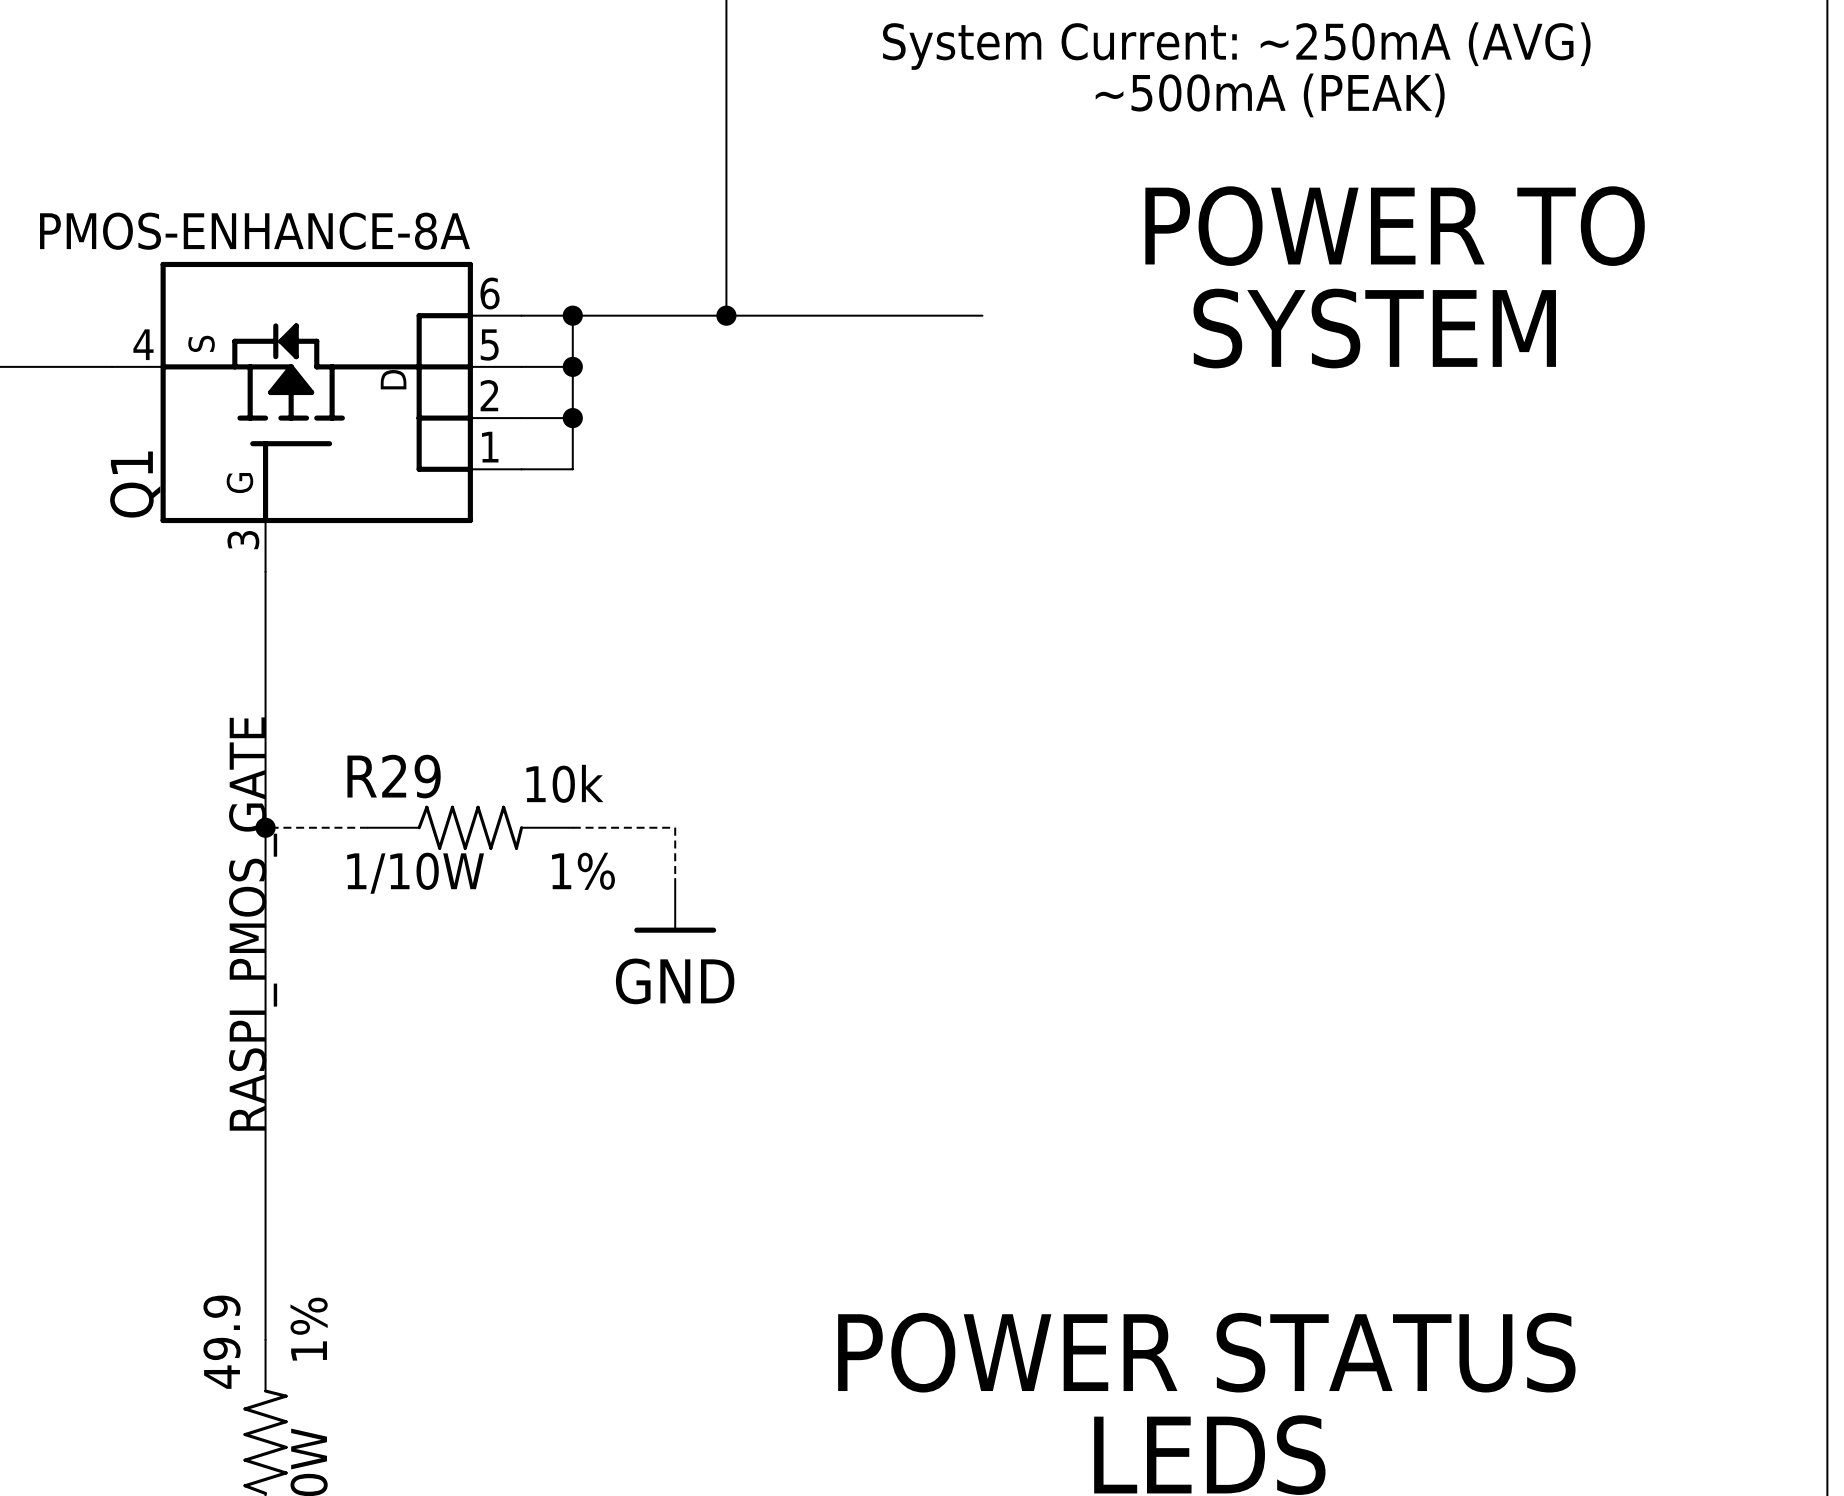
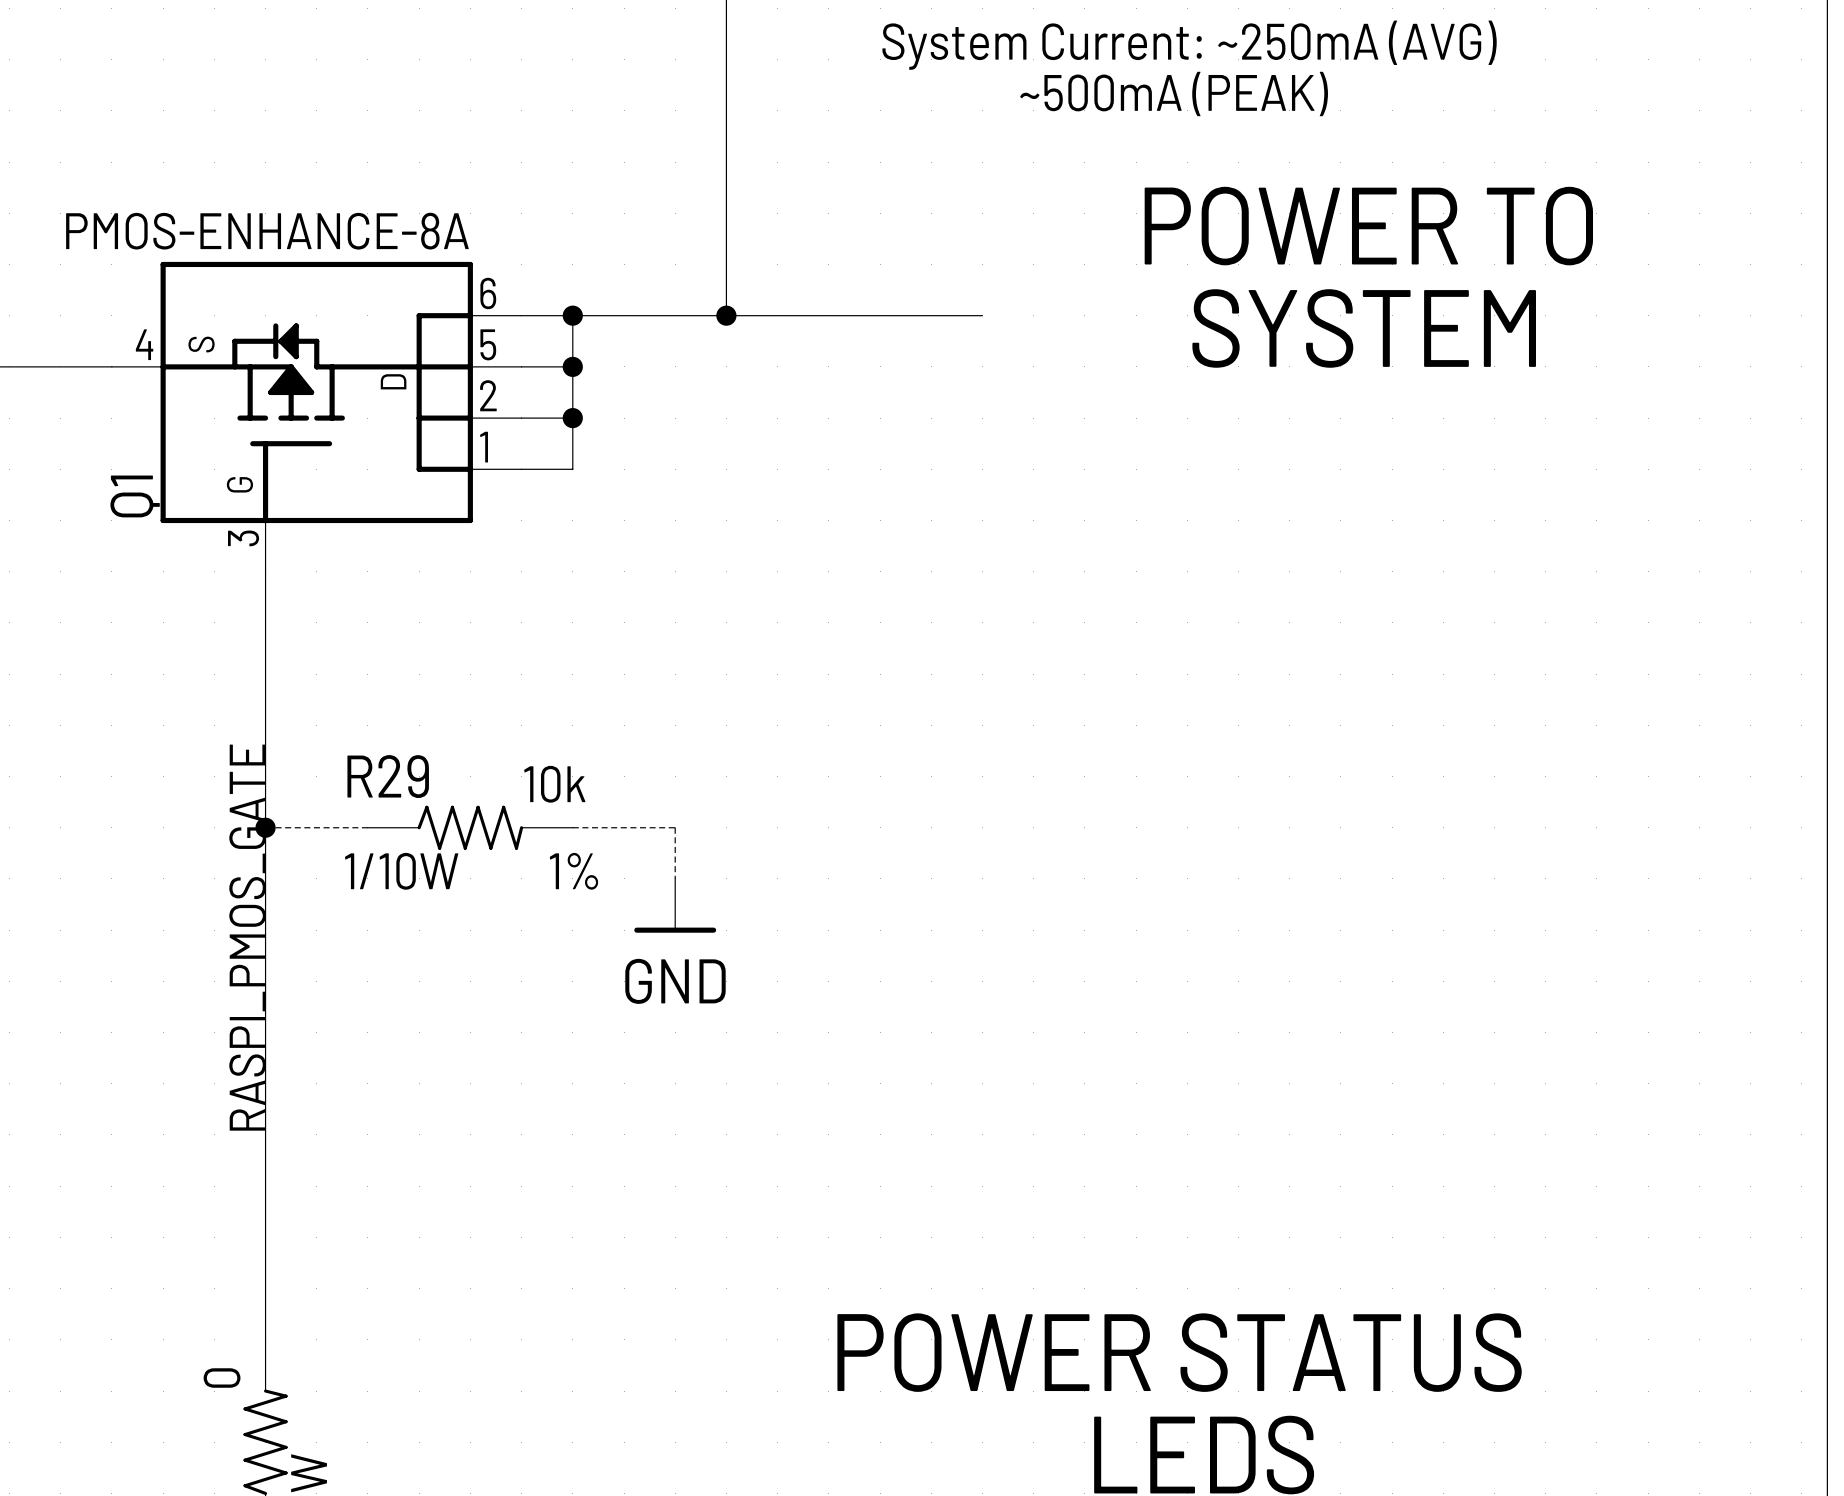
part text: 1% (309, 1329) -> none
part value: 49.9 (222, 1342) -> 0 (222, 1378)

